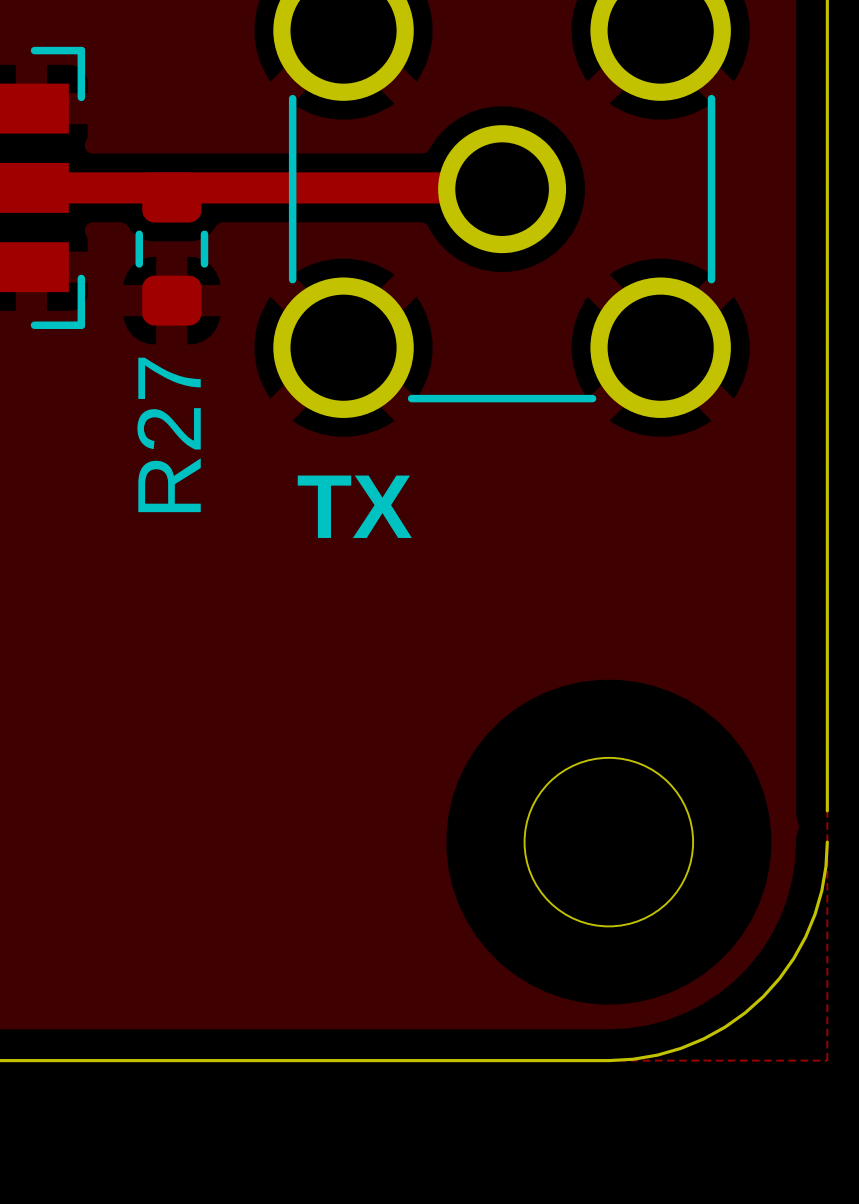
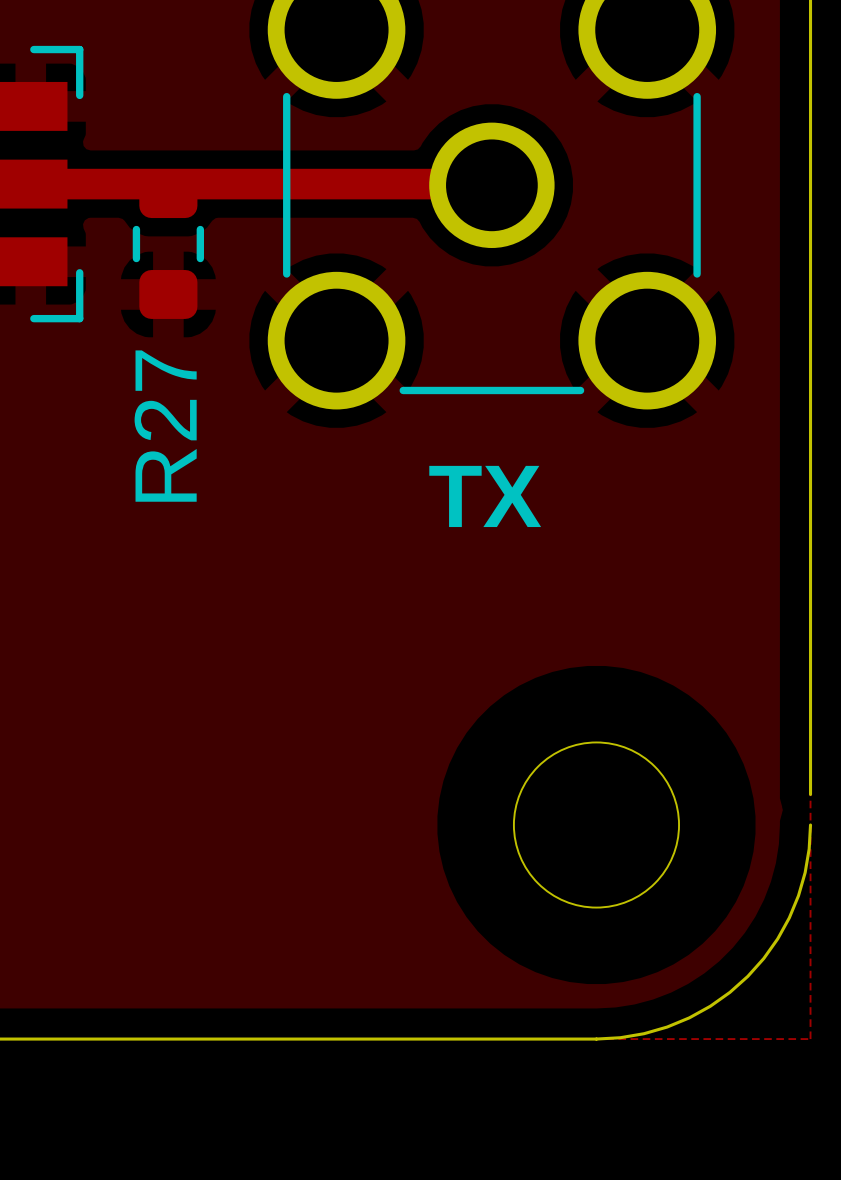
text position: TX (354, 506) -> TX (485, 496)

